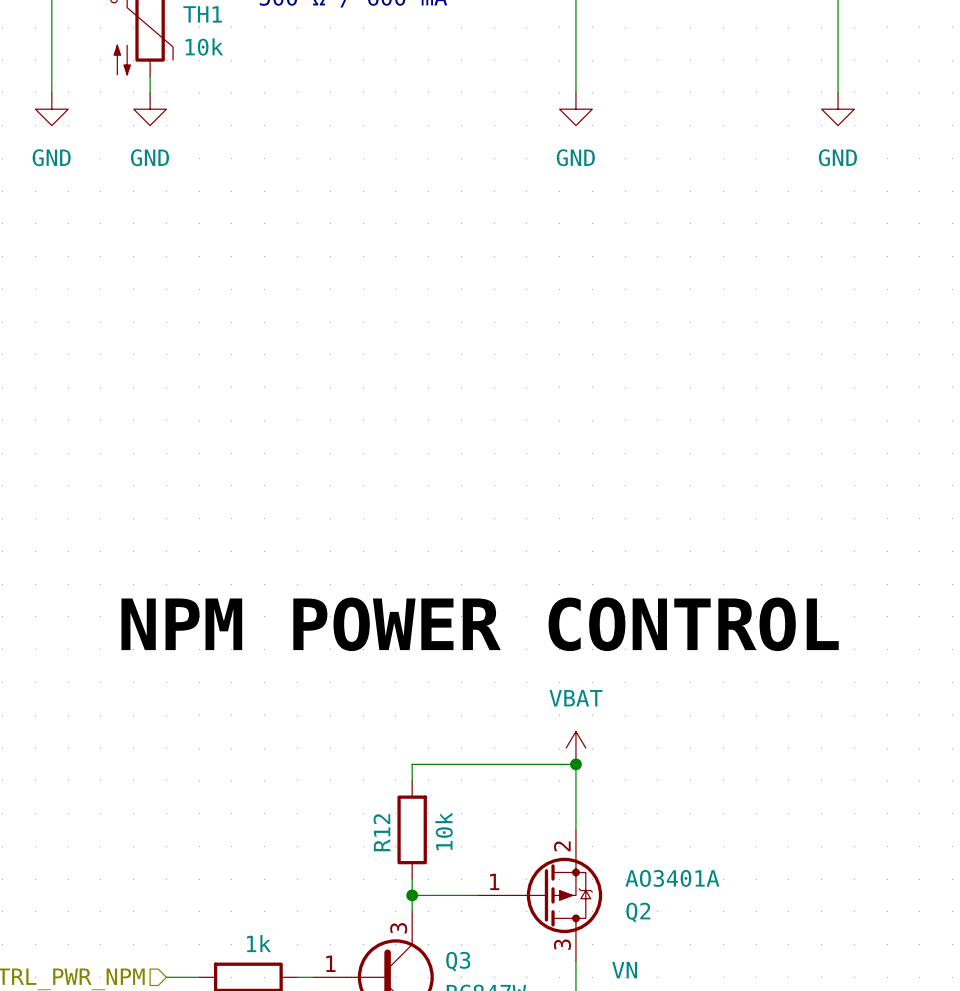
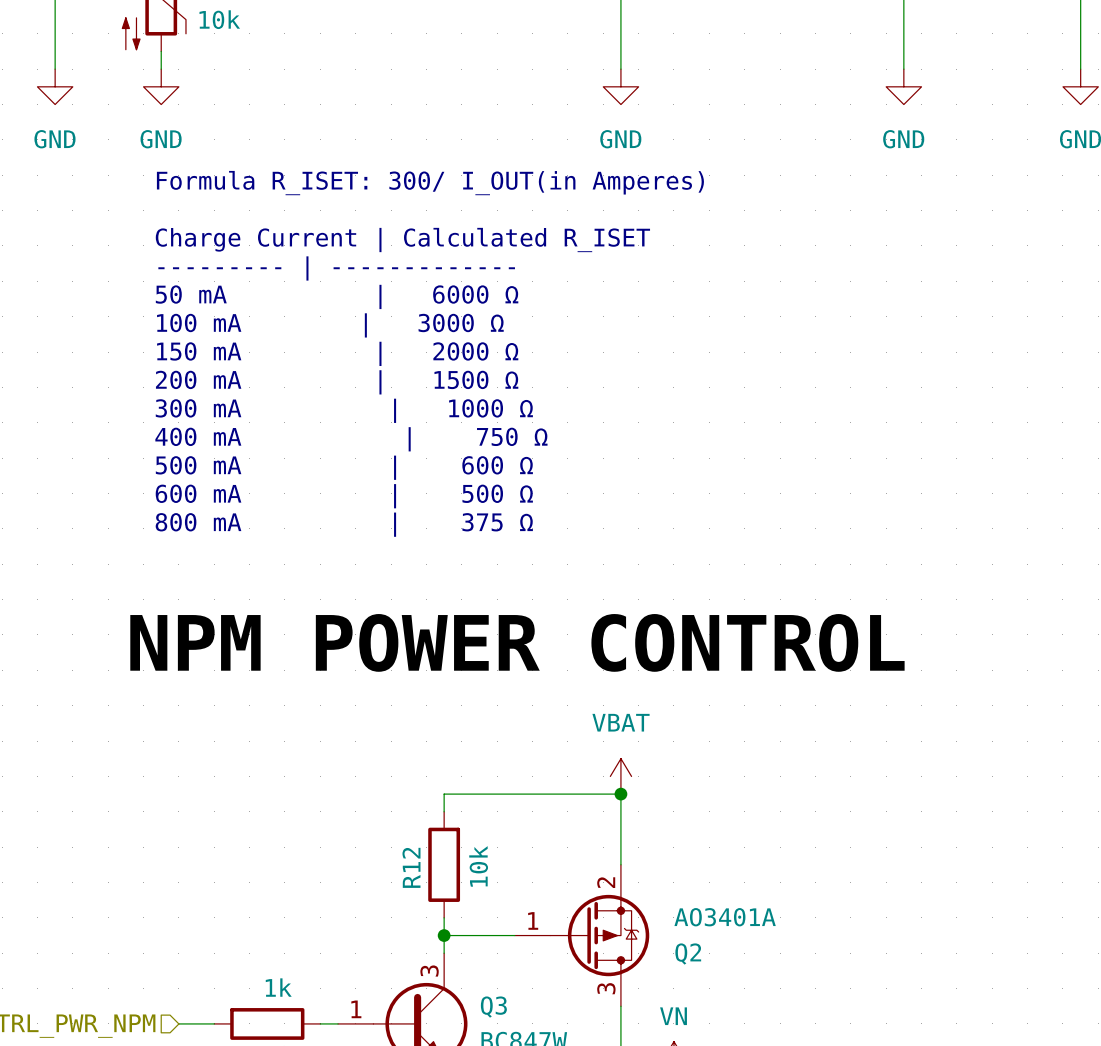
text: none -> Formula R_ISET: 300/ I_OUT(in Amperes) (430, 183)
text: none -> Charge Current | Calculated R_ISET (402, 240)
text: none -> --------- | ------------- (336, 268)
text: none -> 50 mA | 6000 Ω (337, 296)
text: none -> 100 mA | 3000 Ω (330, 325)
text: none -> 150 mA | 2000 Ω (337, 353)
text: none -> 200 mA | 1500 Ω (337, 382)
text: none -> 300 mA | 1000 Ω (344, 410)
text: none -> 400 mA | 750 Ω (351, 439)
text: none -> 500 mA | 600 Ω (344, 467)
text: none -> 600 mA | 500 Ω (344, 496)
text: none -> 800 mA | 375 Ω (344, 524)

